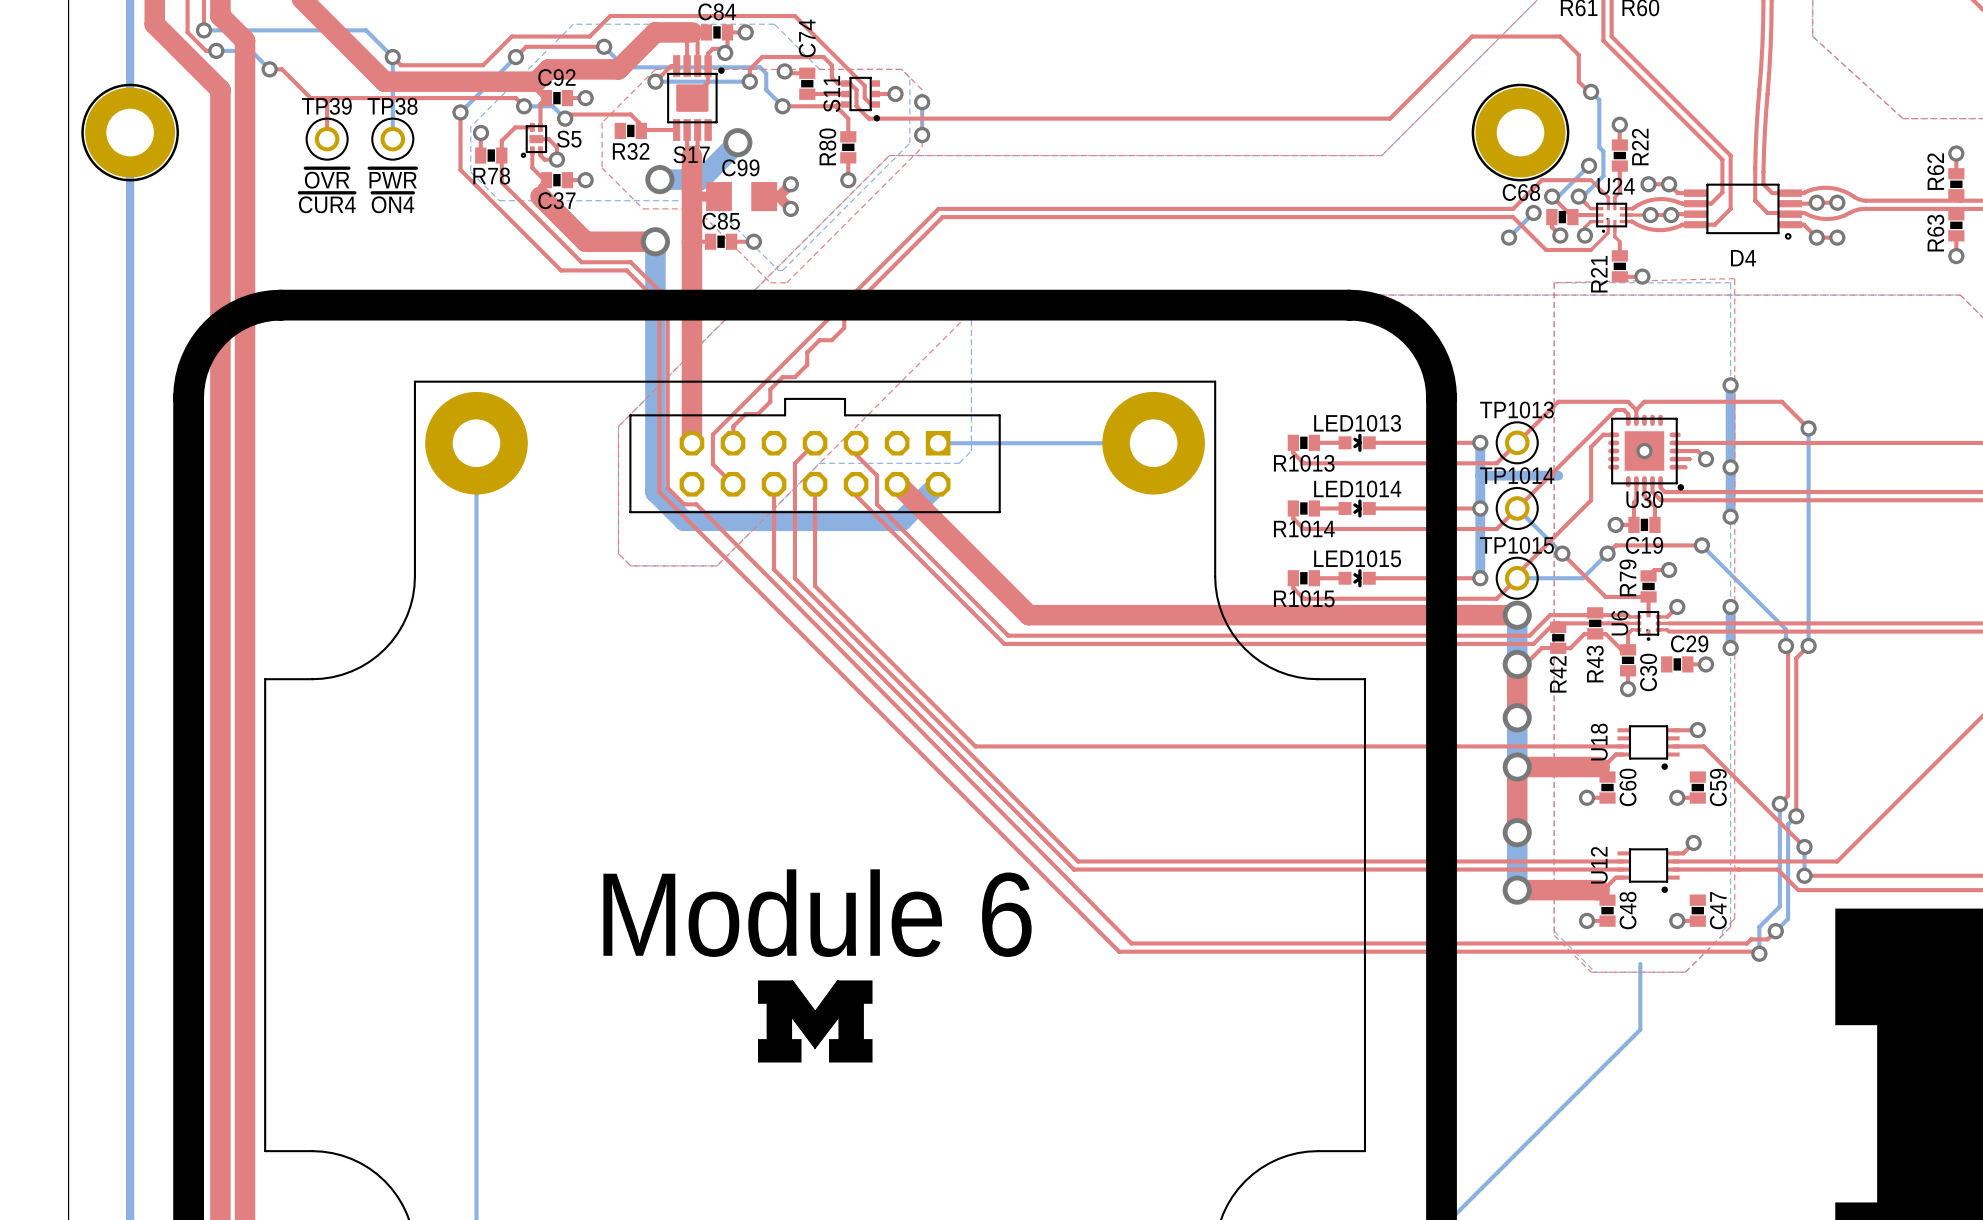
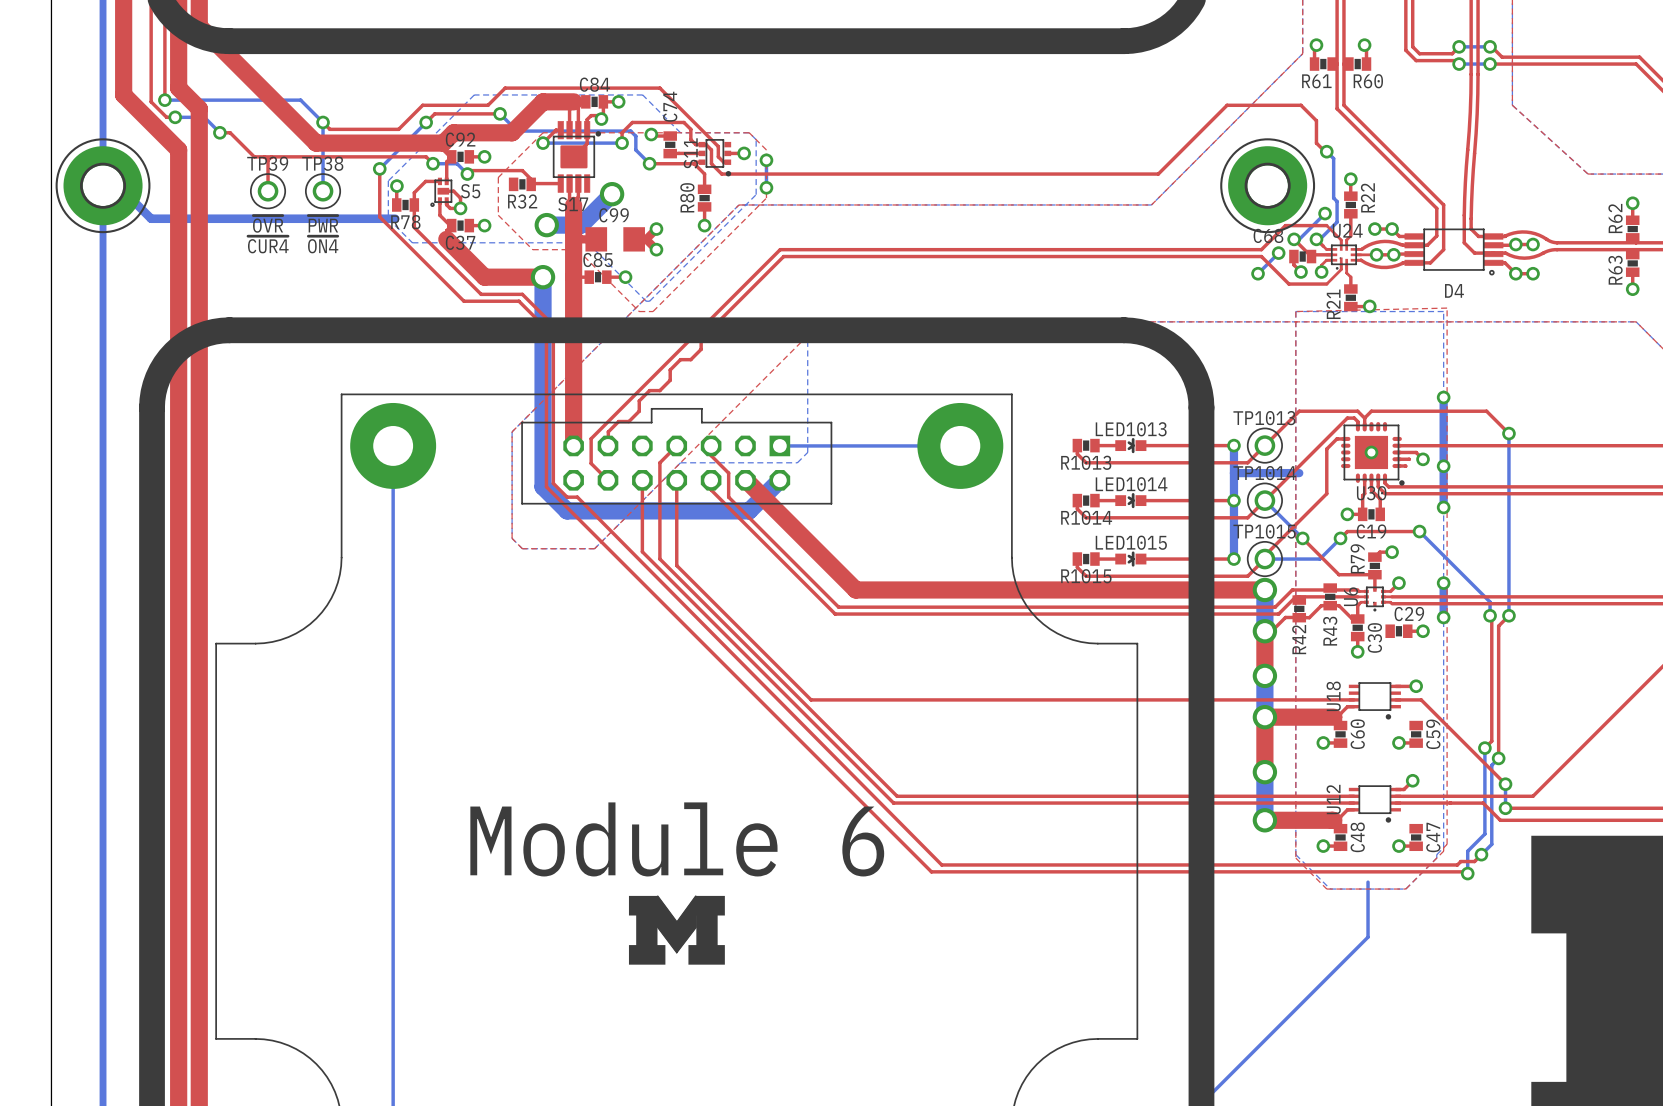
part footprint: [81, 83, 179, 182] -> [55, 138, 151, 234]
part footprint: [1471, 83, 1570, 182] -> [1220, 138, 1316, 234]
bottom track: none -> (103, 187) (120, 187) (151, 218) (395, 218)

